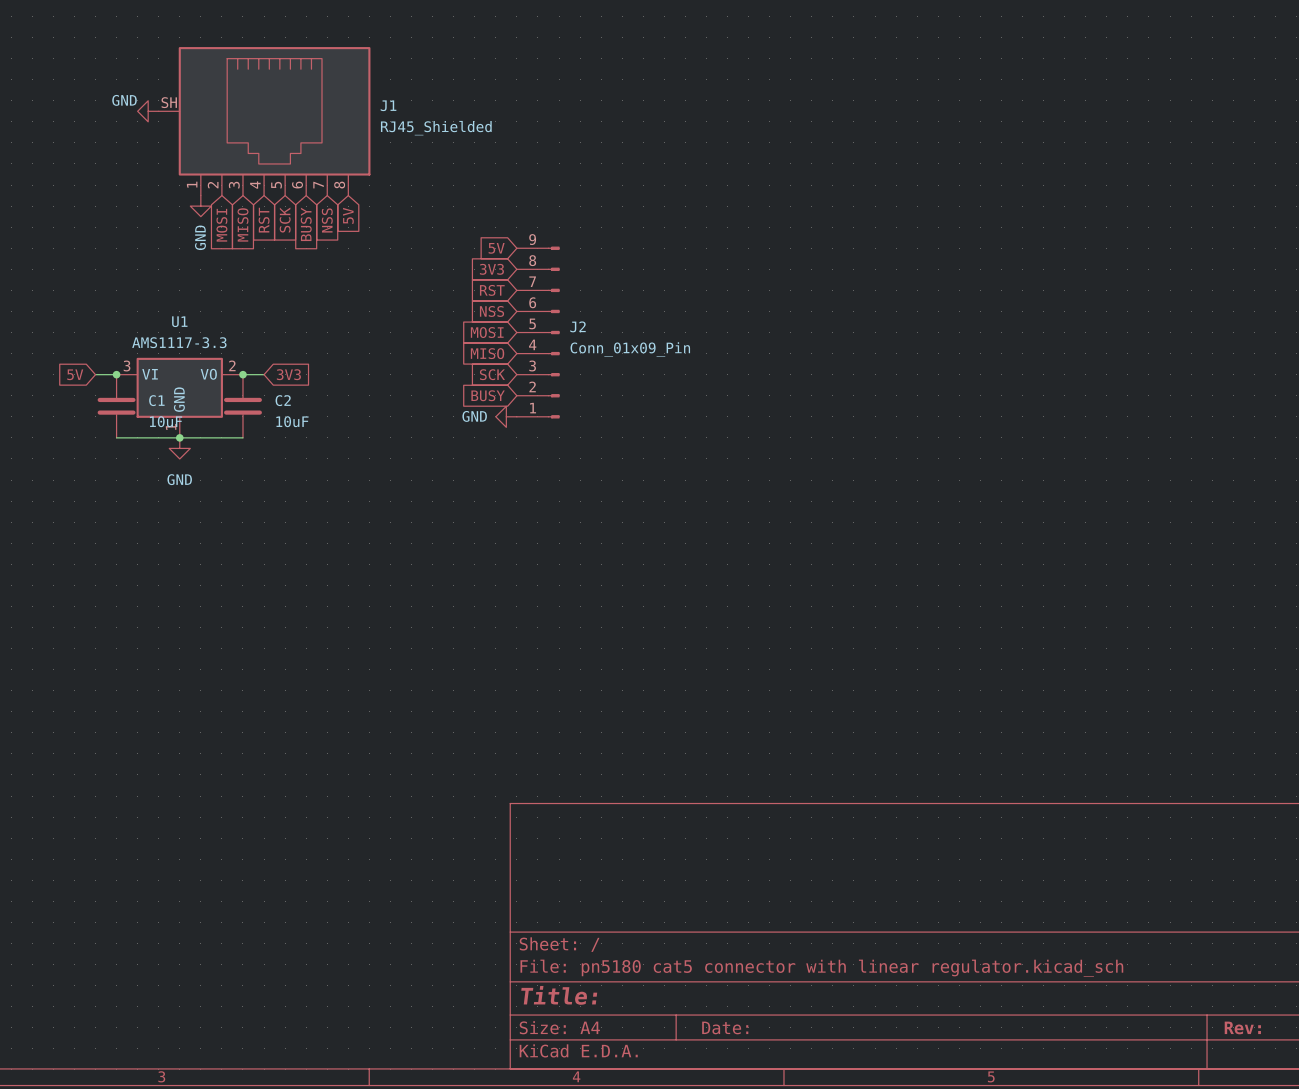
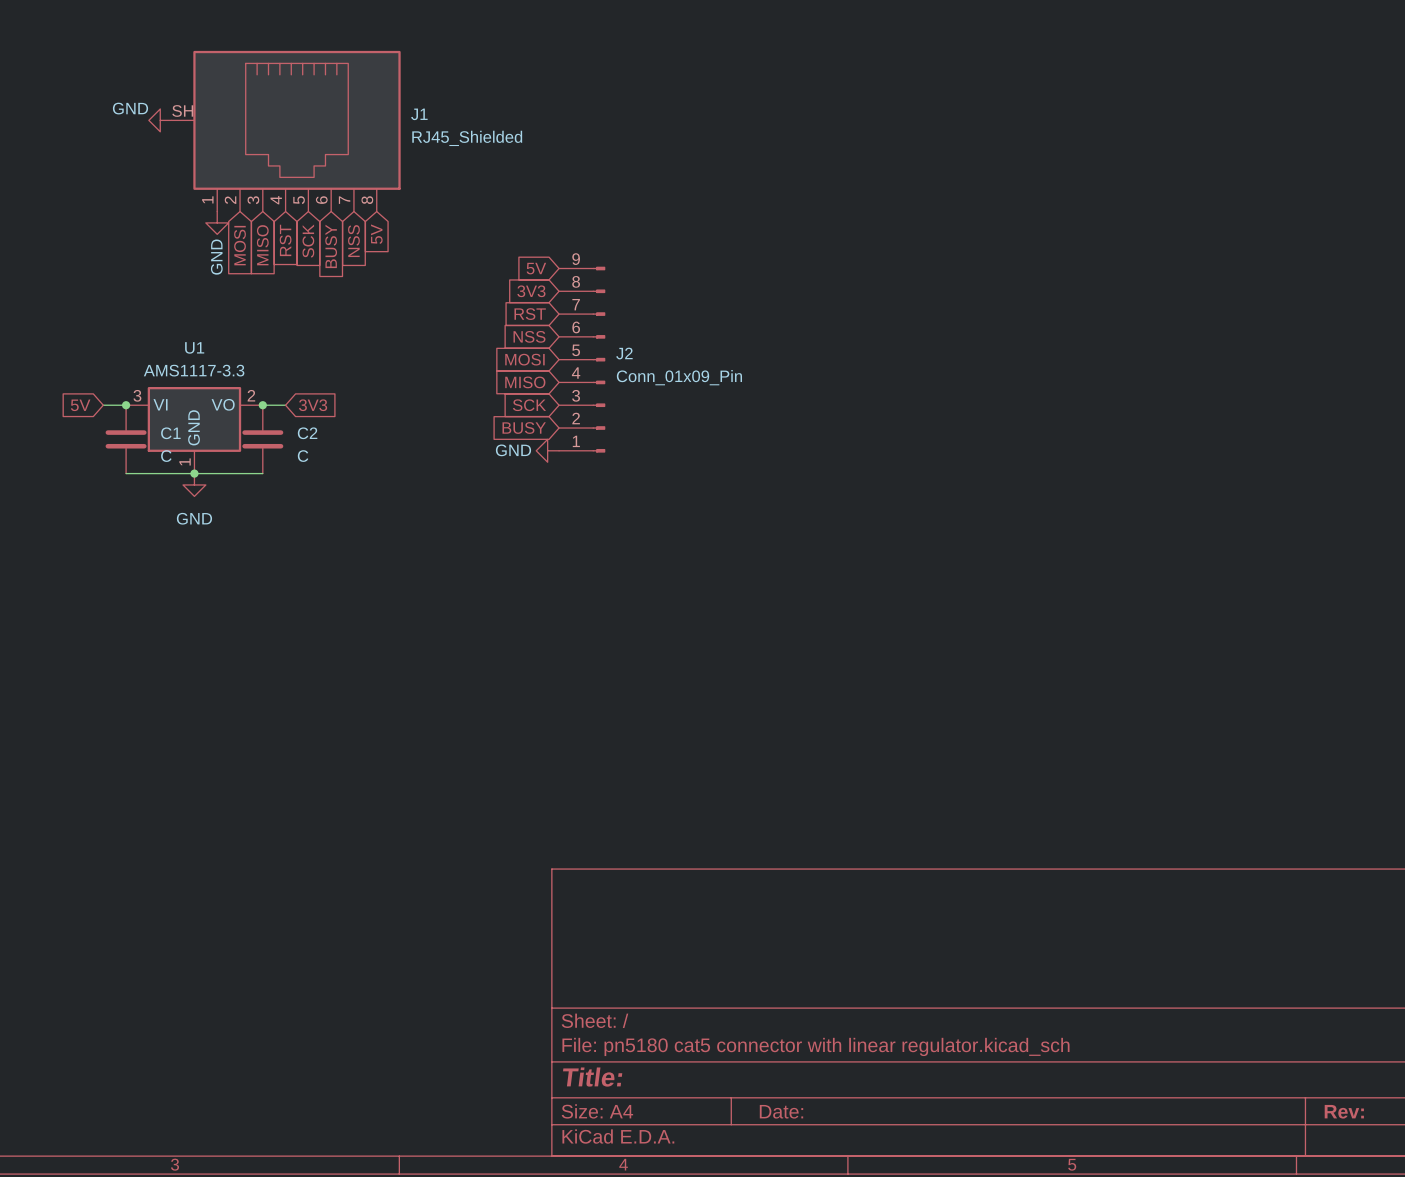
C1 value: 10uF (166, 421) -> C (166, 456)
C2 value: 10uF (292, 421) -> C (303, 456)

